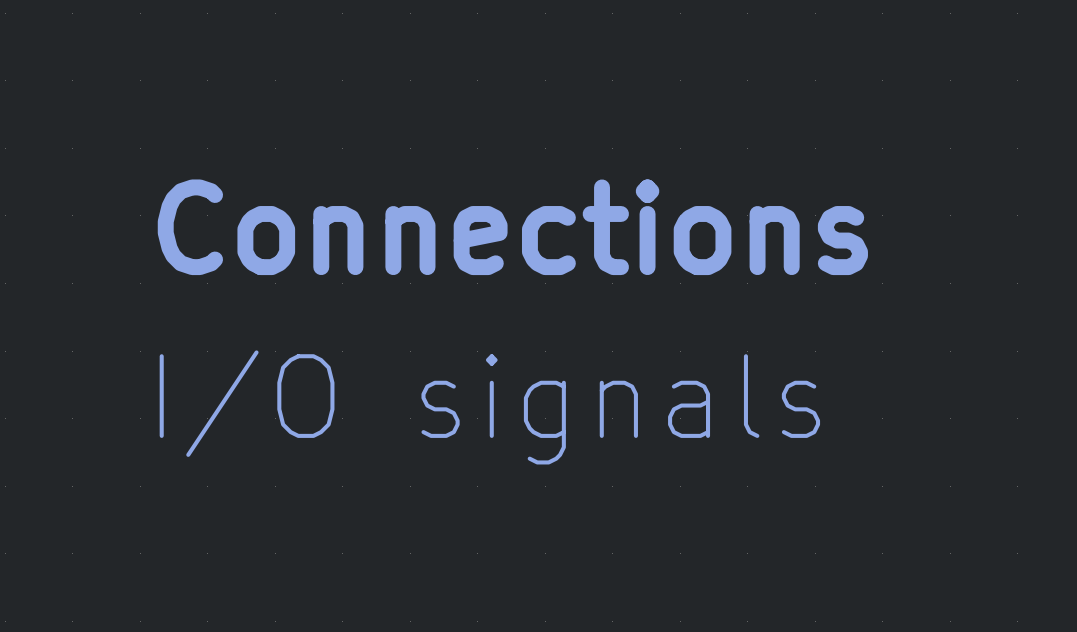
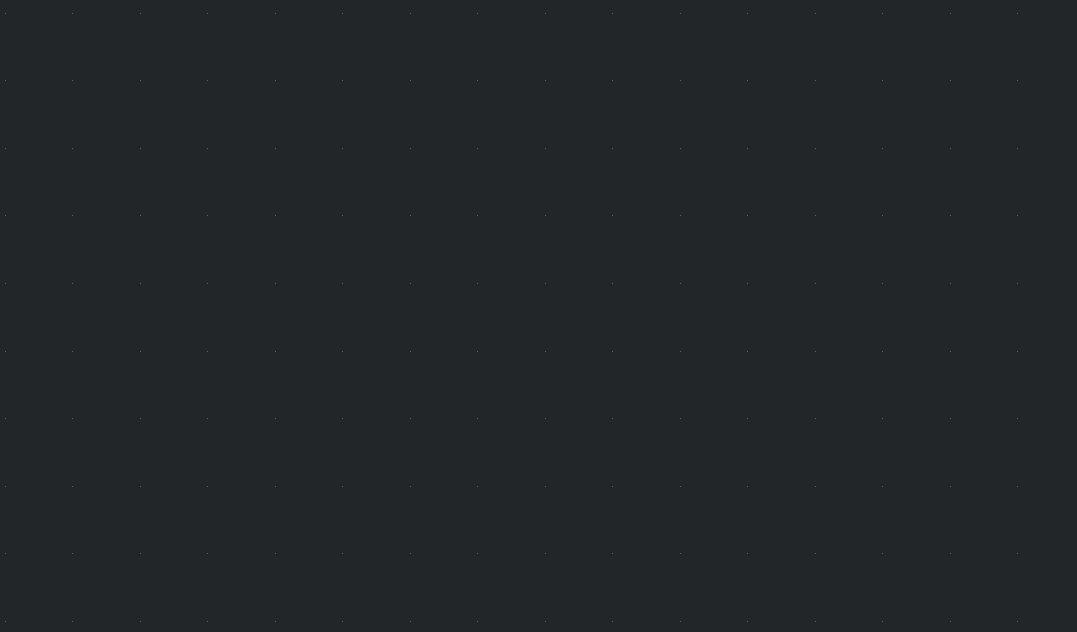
text: Connections (512, 227) -> none
text: I/O signals (489, 407) -> none

